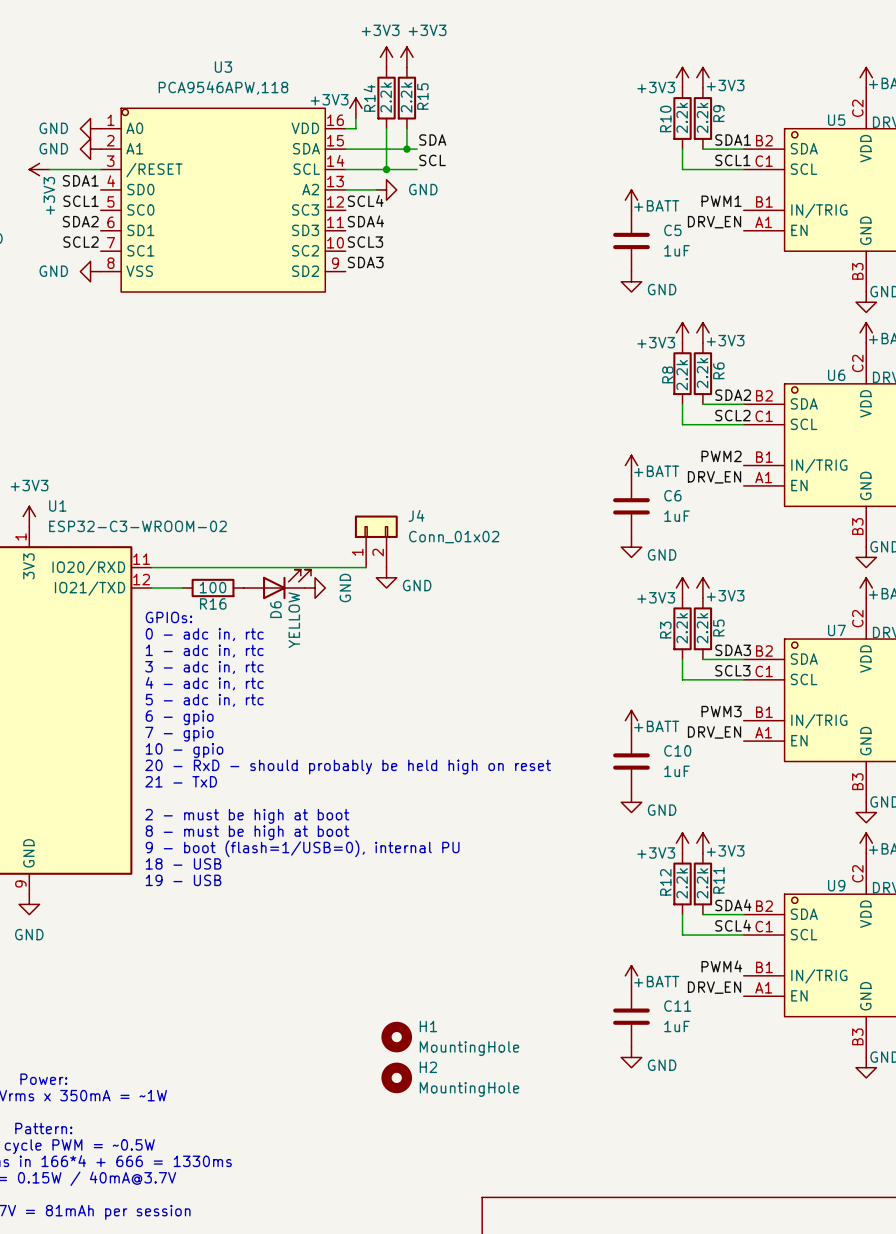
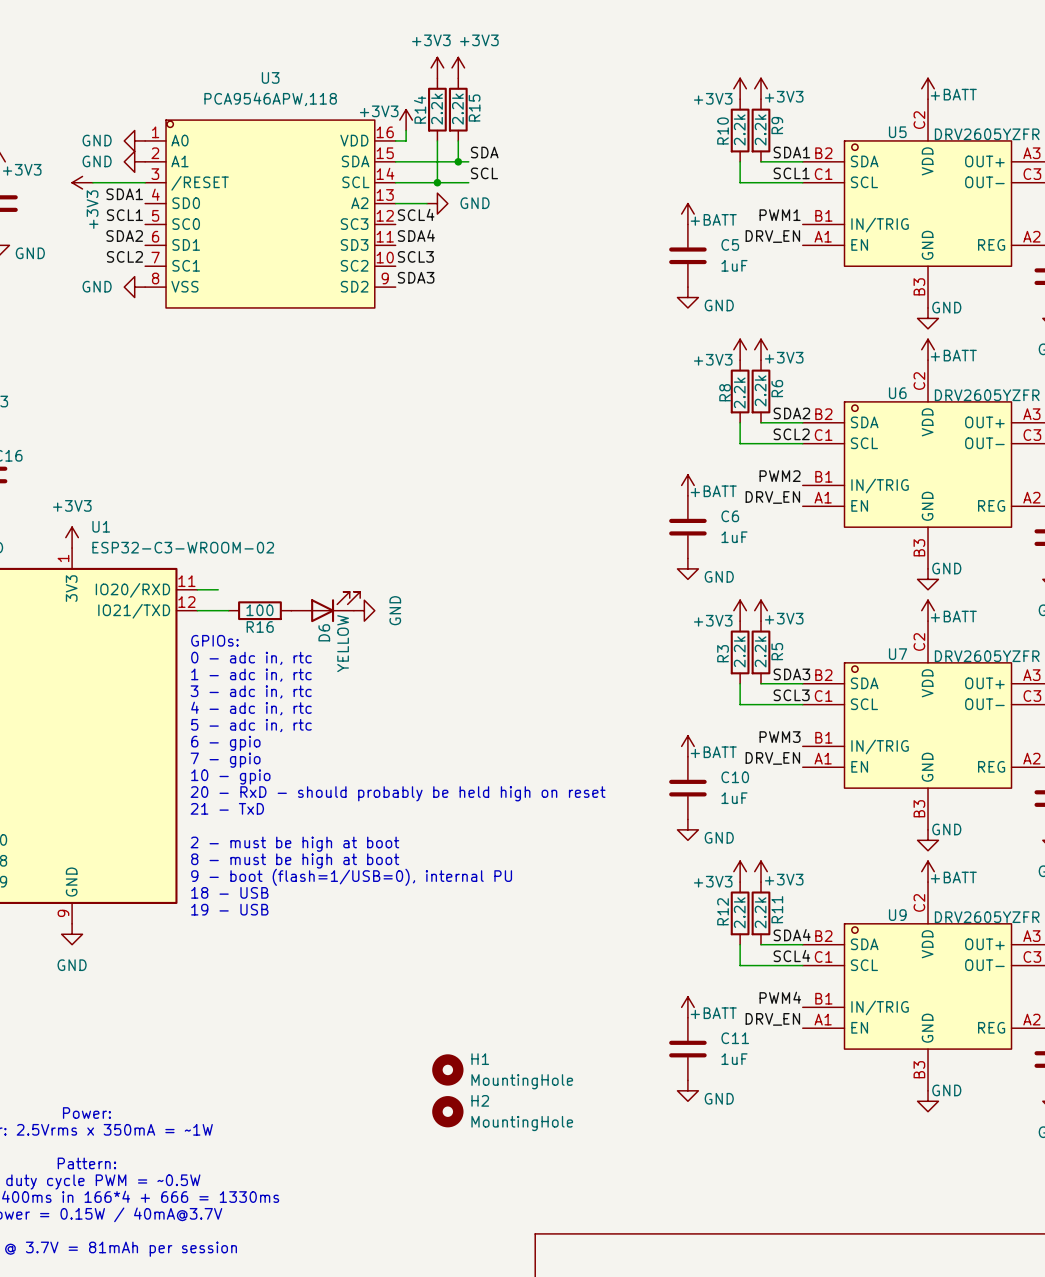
J4: Conn_01x02 (376, 541) -> none
wire: (172, 567) (366, 567) -> none
power symbol: GND (386, 577) -> none

